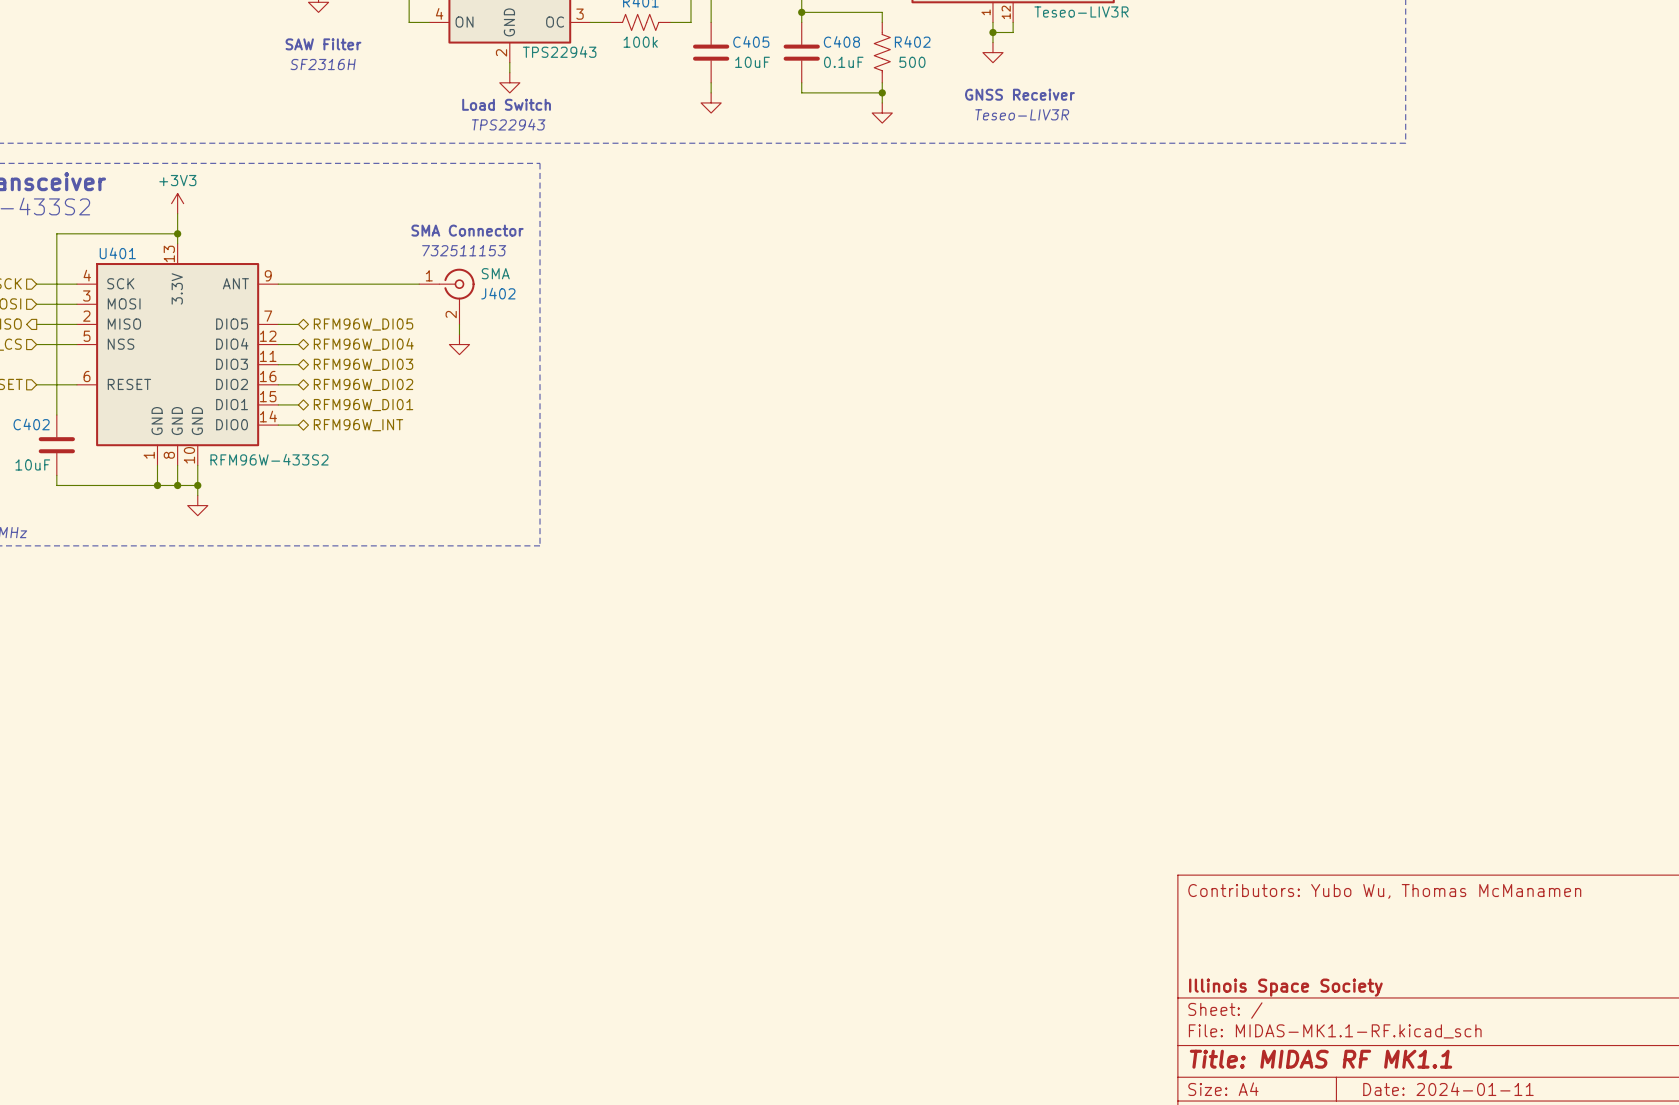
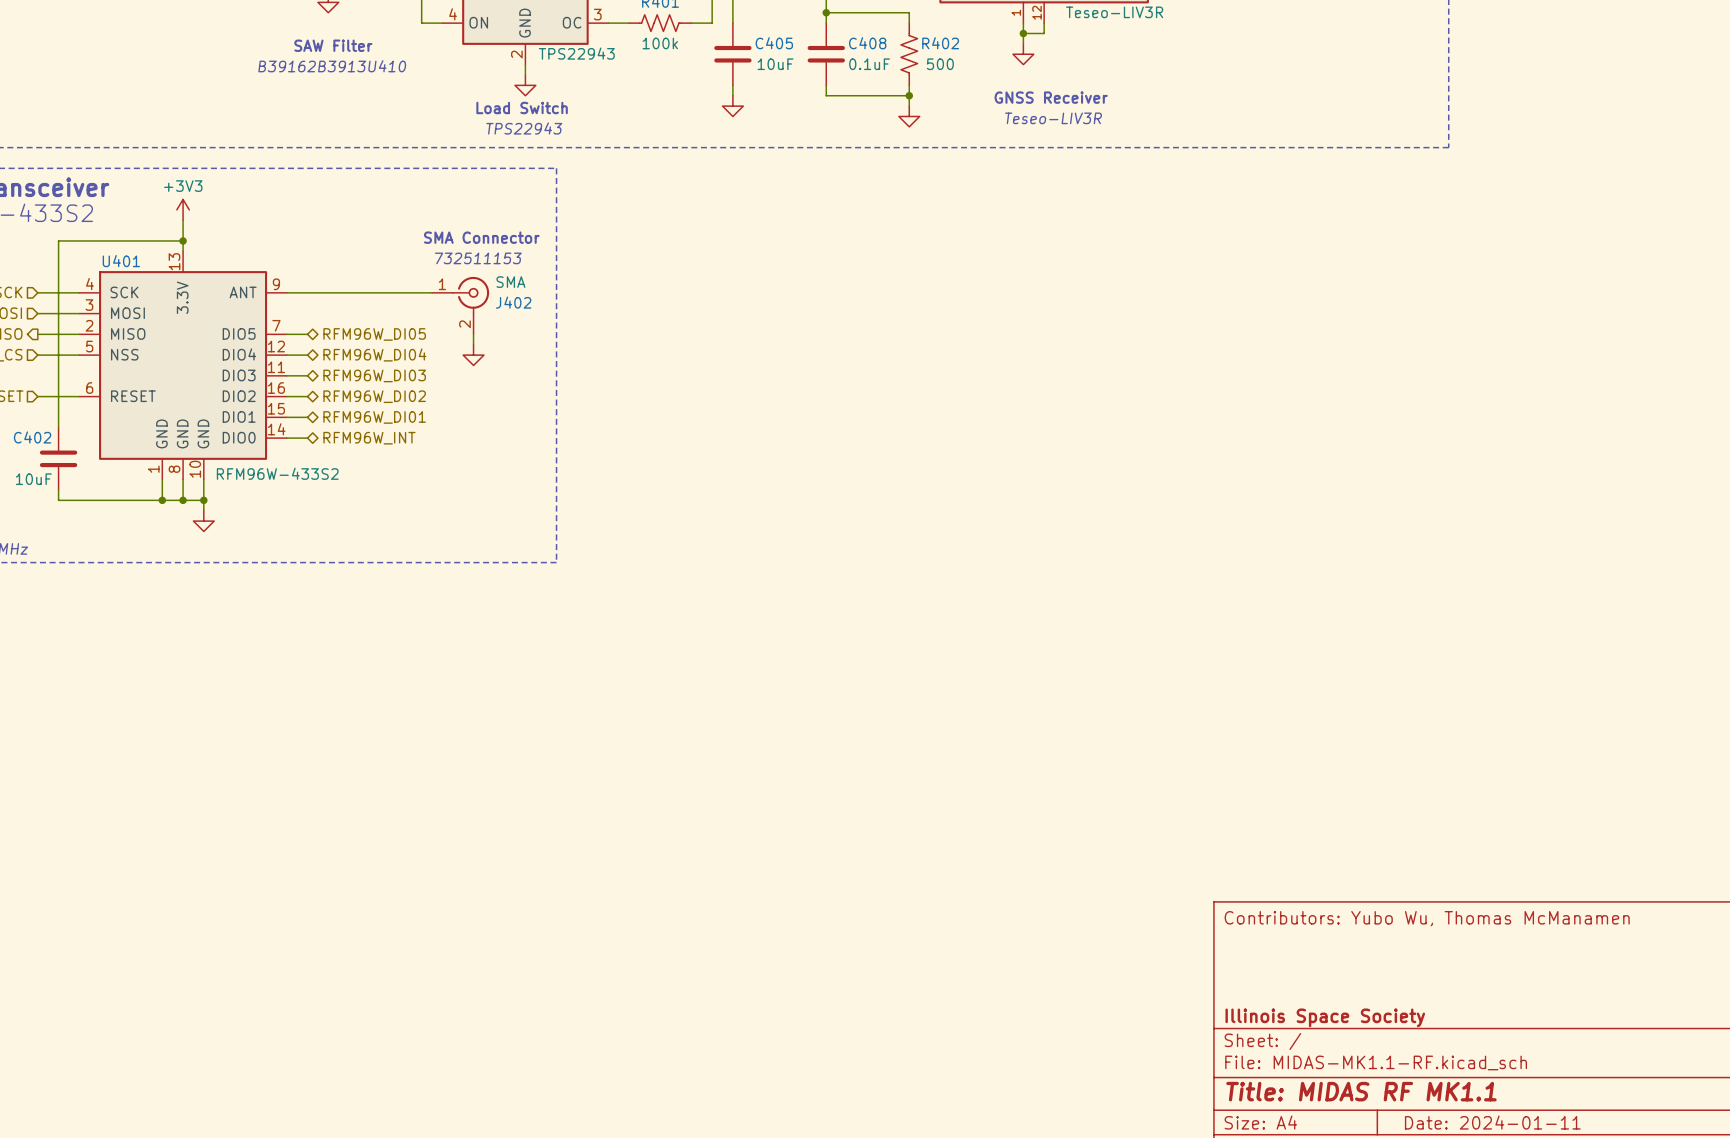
text: none -> B39162B3913U410 (332, 66)
text: SF2316H (323, 64) -> none

